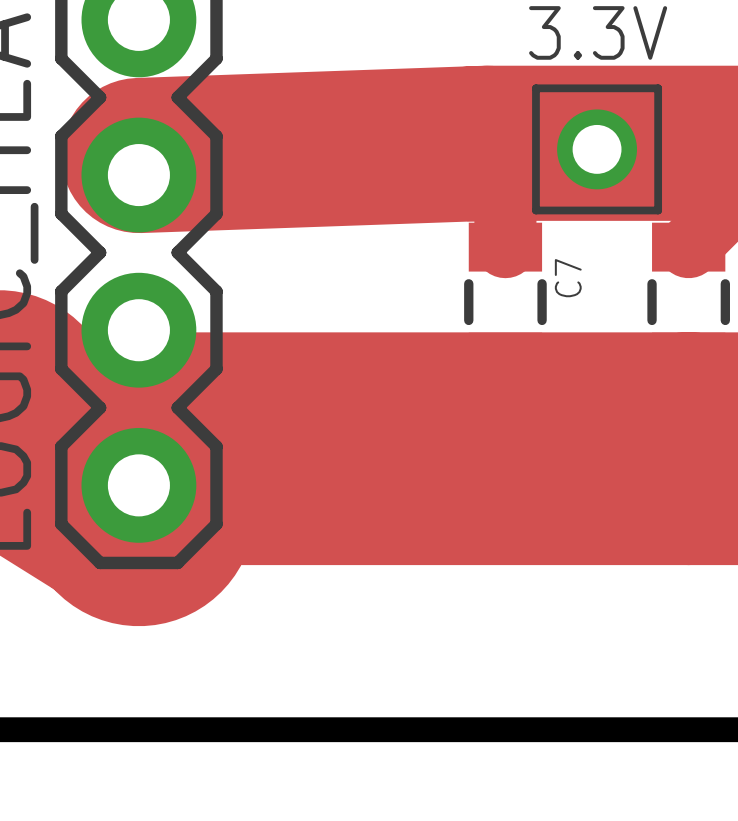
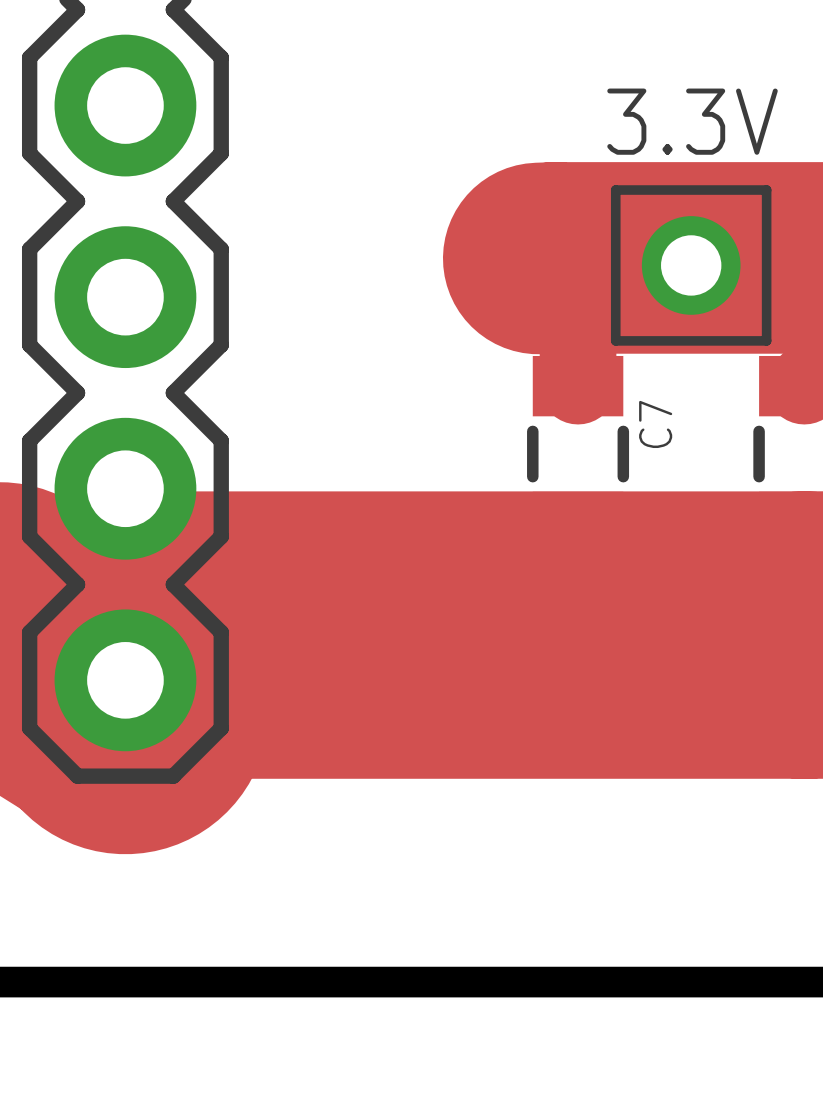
top track: (473, 143) (138, 155) -> none

